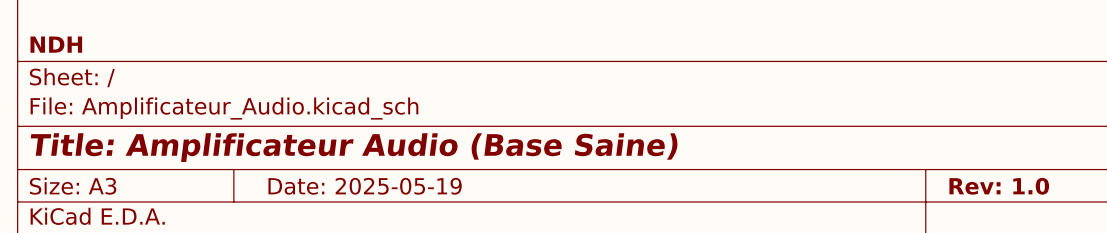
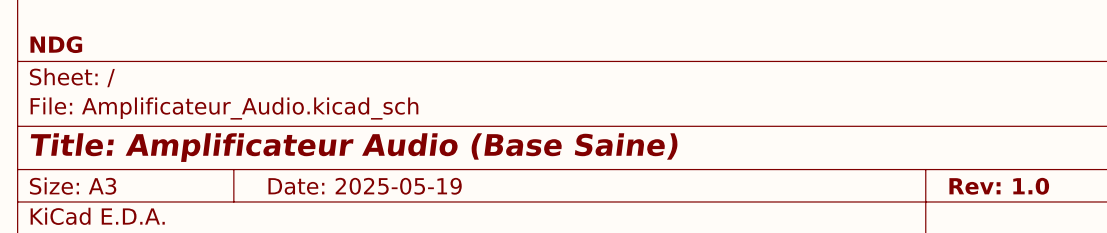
title block: NDH (56, 44) -> NDG (56, 44)

